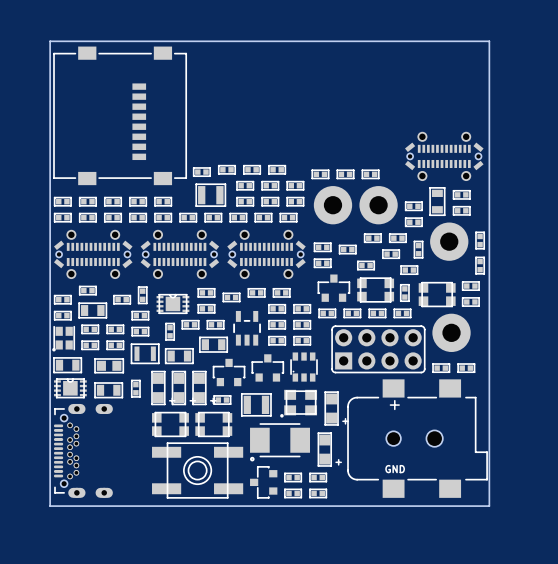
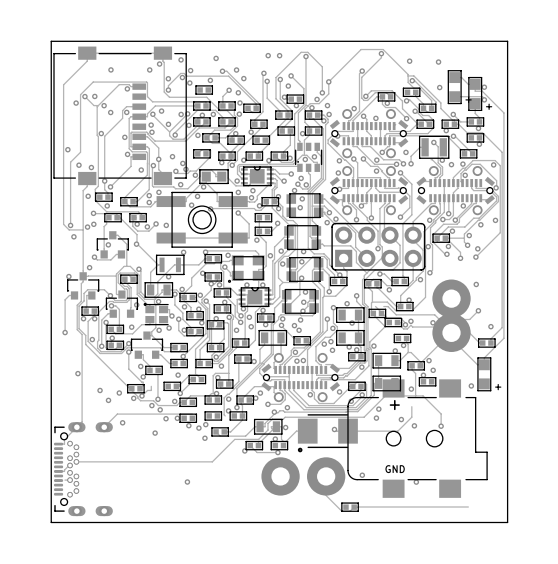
board edge: (51, 41) (50, 506) (489, 506) (489, 41) -> (51, 41) (51, 522) (507, 522) (507, 41) (489, 41)
track: none -> (381, 53) (381, 57) (361, 77) (361, 98) (367, 100) (375, 92) (386, 92) (390, 96)
via: none -> (381, 53)
via: none -> (268, 55)
via: none -> (279, 55)
track: none -> (306, 56) (306, 105) (298, 112) (299, 146)
via: none -> (306, 56)
via: none -> (216, 58)
via: none -> (181, 59)
via: none -> (409, 61)
via: none -> (438, 62)
via: none -> (159, 64)
via: none -> (110, 69)
via: none -> (149, 69)
via: none -> (190, 70)
via: none -> (236, 70)
track: none -> (222, 71) (226, 71) (260, 104) (259, 112) (252, 112) (247, 108)
via: none -> (222, 71)
track: none -> (362, 71) (359, 73) (359, 111) (348, 120) (348, 126)
via: none -> (362, 71)
track: none -> (263, 73) (263, 111) (254, 120) (254, 124)
via: none -> (263, 73)
track: none -> (291, 75) (303, 88) (303, 104) (294, 114) (294, 160) (292, 162) (281, 162) (275, 156)
via: none -> (291, 75)
track: none -> (408, 75) (413, 75) (440, 102) (440, 108) (454, 120) (454, 124) (458, 124) (466, 132) (482, 132) (502, 152) (502, 327) (490, 338) (490, 343)
via: none -> (182, 77)
track: none -> (454, 77) (461, 77) (468, 84) (475, 84) (475, 91) (482, 91) (503, 112) (503, 338) (484, 357) (484, 364) (477, 364) (456, 344) (439, 344) (420, 363)
via: none -> (168, 78)
via: none -> (243, 78)
track: none -> (280, 79) (280, 99) (292, 110) (292, 118) (282, 126) (282, 131)
via: none -> (280, 79)
via: none -> (210, 80)
track: none -> (412, 80) (414, 80) (436, 102) (436, 111) (427, 112) (423, 108) (423, 104) (415, 96) (415, 92)
via: none -> (412, 80)
track: none -> (267, 81) (267, 98) (279, 110) (279, 115)
via: none -> (267, 81)
via: none -> (328, 81)
via: none -> (189, 83)
track: none -> (139, 86) (119, 84) (97, 106) (98, 186) (95, 189) (95, 200) (106, 211) (138, 211) (144, 217)
via: none -> (288, 86)
via: none -> (439, 87)
part: none -> (454, 87)
via: none -> (484, 87)
via: none -> (127, 88)
track: none -> (168, 90) (168, 85) (180, 73) (186, 76) (228, 76) (256, 103) (256, 108)
via: none -> (168, 90)
part: none -> (204, 90)
track: none -> (229, 90) (222, 96) (222, 105)
via: none -> (229, 90)
via: none -> (238, 92)
track: none -> (322, 92) (322, 66) (307, 52) (301, 52) (276, 77) (276, 98) (288, 110) (288, 119) (269, 135) (269, 143) (261, 152) (258, 152) (258, 156)
via: none -> (322, 92)
part: none -> (411, 92)
part: none -> (475, 93)
track: none -> (84, 96) (93, 105) (98, 105)
via: none -> (84, 96)
via: none -> (94, 96)
track: none -> (365, 96) (371, 90) (392, 90) (402, 101) (402, 108) (417, 124)
via: none -> (365, 96)
part: none -> (386, 96)
via: none -> (284, 97)
part: none -> (295, 99)
via: none -> (317, 99)
via: none -> (484, 99)
track: none -> (406, 100) (409, 99) (422, 115) (428, 115) (434, 120) (434, 127) (427, 133) (387, 133) (385, 141)
via: none -> (406, 100)
via: none -> (239, 102)
via: none -> (76, 103)
via: none -> (387, 103)
track: none -> (475, 103) (475, 113) (479, 117) (479, 121)
via: none -> (104, 105)
track: none -> (197, 105) (155, 105) (147, 113) (147, 116) (131, 116) (129, 118) (129, 148) (132, 151) (147, 152) (147, 175) (124, 197) (124, 201) (129, 206) (150, 206) (155, 201) (186, 201) (186, 198) (201, 182) (206, 183)
part: none -> (201, 105)
track: none -> (206, 105) (206, 101) (152, 101) (147, 96) (146, 82) (93, 82) (80, 94) (80, 152) (70, 162) (70, 225)
part: none -> (226, 105)
via: none -> (296, 105)
via: none -> (327, 105)
track: none -> (139, 106) (126, 106) (122, 110) (122, 118) (104, 136) (104, 189) (108, 193) (108, 197)
via: none -> (311, 107)
part: none -> (252, 108)
via: none -> (354, 108)
part: none -> (427, 108)
track: none -> (431, 108) (431, 100) (419, 88) (413, 88) (408, 82) (408, 74) (383, 49) (361, 49) (328, 81) (328, 93) (319, 103) (310, 103) (304, 109) (304, 122) (309, 126) (309, 135) (304, 140) (304, 155)
via: none -> (161, 111)
track: none -> (234, 111) (234, 115) (237, 118) (237, 125) (225, 137) (215, 137)
track: none -> (415, 111) (429, 124)
via: none -> (415, 111)
via: none -> (110, 112)
via: none -> (126, 112)
track: none -> (187, 113) (169, 131)
via: none -> (187, 113)
track: none -> (152, 114) (169, 131)
via: none -> (152, 114)
via: none -> (181, 114)
via: none -> (213, 114)
via: none -> (239, 114)
via: none -> (329, 114)
track: none -> (453, 114) (460, 121) (471, 121)
via: none -> (453, 114)
via: none -> (202, 115)
part: none -> (283, 115)
track: none -> (309, 115) (309, 119) (313, 119) (323, 128) (323, 178) (310, 192) (310, 236) (316, 238) (316, 244) (350, 245) (356, 251) (356, 262) (366, 273)
part: none -> (313, 115)
track: none -> (317, 115) (323, 115) (328, 119) (328, 122) (325, 125) (325, 179) (312, 192) (312, 220) (316, 224) (316, 230)
track: none -> (363, 116) (366, 119) (366, 131) (371, 135) (371, 141)
via: none -> (363, 116)
via: none -> (375, 118)
track: none -> (406, 118) (395, 107) (385, 107) (382, 104) (382, 96) (376, 96) (353, 120) (353, 131) (336, 131) (328, 139) (328, 143) (353, 168) (353, 183)
via: none -> (406, 118)
via: none -> (323, 120)
part: none -> (201, 121)
track: none -> (206, 121) (201, 126) (197, 126) (183, 139) (173, 139) (169, 135) (169, 131)
track: none -> (222, 121) (222, 117) (215, 110) (197, 110) (175, 132) (175, 135)
part: none -> (226, 121)
track: none -> (231, 121) (225, 127) (199, 127) (185, 141) (154, 141) (146, 132) (131, 132) (131, 146) (147, 146) (149, 148) (149, 189) (137, 201) (133, 201)
part: none -> (475, 121)
via: none -> (168, 124)
part: none -> (258, 124)
track: none -> (417, 124) (409, 131) (389, 131) (389, 126)
part: none -> (425, 124)
part: none -> (450, 124)
via: none -> (151, 125)
via: none -> (188, 125)
track: none -> (263, 126) (237, 151) (237, 160) (232, 165)
track: none -> (357, 126) (357, 141)
track: none -> (380, 126) (380, 141)
via: none -> (478, 128)
via: none -> (446, 130)
part: none -> (286, 131)
track: none -> (290, 131) (290, 145) (283, 152) (283, 156) (290, 158)
part: none -> (313, 131)
via: none -> (151, 132)
via: none -> (251, 132)
via: none -> (101, 133)
via: none -> (235, 133)
via: none -> (302, 133)
part: none -> (369, 133)
via: none -> (175, 135)
via: none -> (197, 135)
track: none -> (139, 136) (147, 136) (158, 148) (158, 169) (162, 173) (162, 178)
track: none -> (337, 136) (348, 135) (348, 141)
via: none -> (337, 136)
track: none -> (453, 136) (472, 153)
via: none -> (453, 136)
via: none -> (124, 137)
part: none -> (211, 137)
part: none -> (475, 137)
part: none -> (236, 140)
track: none -> (240, 140) (240, 144) (231, 152) (231, 160) (228, 163) (228, 178) (235, 185) (250, 184) (250, 175) (242, 174) (239, 171) (240, 166) (299, 167)
part: none -> (261, 140)
track: none -> (353, 141) (353, 146) (356, 146) (374, 164) (396, 164)
track: none -> (362, 141) (362, 146) (370, 146) (383, 159) (399, 159) (403, 163)
track: none -> (394, 142) (403, 142)
track: none -> (433, 142) (438, 146) (438, 162) (442, 167) (439, 183)
via: none -> (433, 142)
via: none -> (479, 144)
track: none -> (317, 146) (317, 152) (321, 156) (321, 178) (308, 191) (308, 248) (314, 253) (324, 253) (329, 259) (329, 264) (342, 277) (342, 281)
track: none -> (425, 147) (420, 147) (411, 156) (411, 163)
part: none -> (434, 147)
via: none -> (67, 149)
track: none -> (382, 152) (389, 146) (389, 135) (446, 135) (460, 149) (464, 149) (464, 153)
via: none -> (382, 152)
via: none -> (405, 152)
track: none -> (197, 153) (201, 149) (210, 150) (210, 156) (196, 171) (190, 171) (187, 173) (178, 173) (175, 171)
part: none -> (201, 153)
part: none -> (468, 153)
via: none -> (127, 154)
track: none -> (231, 154) (220, 143) (212, 143) (206, 137) (214, 130) (230, 130) (235, 125) (235, 118) (227, 110) (220, 110) (206, 97) (169, 97) (164, 92) (162, 53) (87, 53) (87, 61) (63, 84) (63, 224) (69, 229) (83, 229)
track: none -> (139, 156) (131, 156) (131, 166) (110, 186)
via: none -> (172, 156)
part: none -> (254, 156)
part: none -> (279, 156)
via: none -> (314, 156)
part: (444, 156) -> none
via: none -> (290, 158)
track: none -> (363, 158) (370, 166) (377, 166) (389, 177) (389, 183)
via: none -> (363, 158)
via: none -> (158, 159)
via: none -> (305, 159)
track: none -> (353, 159) (357, 162) (357, 198)
via: none -> (353, 159)
track: none -> (431, 159) (440, 168) (440, 173) (435, 177) (435, 183)
via: none -> (243, 160)
via: none -> (268, 160)
via: none -> (339, 160)
via: none -> (376, 160)
via: none -> (442, 160)
via: none -> (221, 162)
via: none -> (182, 163)
track: none -> (268, 163) (293, 164) (302, 155) (306, 155) (313, 162) (317, 162) (317, 167)
track: none -> (268, 163) (239, 164) (237, 174) (244, 178)
via: none -> (403, 163)
via: none -> (411, 163)
via: none -> (396, 164)
via: none -> (451, 164)
via: none -> (462, 164)
via: none -> (493, 164)
via: none -> (78, 165)
track: none -> (153, 165) (153, 186) (187, 188) (200, 176) (201, 170) (211, 170) (215, 176) (221, 176)
via: none -> (153, 165)
via: none -> (232, 165)
via: none -> (91, 167)
track: none -> (308, 167) (310, 186) (307, 189) (302, 189) (297, 184)
via: none -> (185, 169)
part position: (226, 169) -> (226, 156)
part: (252, 169) -> none
track: none -> (270, 169) (275, 169) (279, 174) (291, 174)
part: (277, 169) -> none
via: none -> (141, 170)
via: none -> (175, 171)
via: none -> (376, 171)
part: (201, 172) -> none
track: none -> (400, 172) (411, 184) (411, 214) (402, 223) (404, 281)
via: none -> (400, 172)
via: none -> (338, 173)
track: none -> (270, 174) (275, 174) (284, 181)
via: none -> (291, 174)
part: (320, 174) -> none
part: (345, 174) -> none
part: (370, 174) -> none
via: none -> (195, 175)
via: none -> (465, 175)
part: none -> (257, 176)
track: none -> (357, 177) (380, 177) (380, 183)
track: none -> (87, 178) (87, 186) (83, 190) (83, 281) (81, 283) (81, 301) (77, 305) (77, 329) (82, 334) (82, 422) (64, 439) (64, 444) (58, 444)
track: none -> (270, 178) (276, 180) (274, 198) (282, 206) (282, 215) (287, 220) (293, 220) (297, 224) (297, 268) (291, 269) (291, 276)
via: none -> (301, 178)
via: none -> (104, 181)
via: none -> (237, 181)
via: none -> (284, 181)
track: none -> (421, 181) (429, 181)
track: none -> (206, 183) (217, 193) (217, 201) (249, 202) (254, 202) (257, 196) (270, 183) (275, 183) (272, 189) (272, 208) (288, 224) (295, 225) (295, 249) (278, 262) (278, 277) (282, 282)
track: none -> (348, 183) (348, 188) (339, 189)
track: none -> (371, 183) (371, 188) (366, 192) (366, 203) (361, 205)
track: none -> (375, 183) (375, 188) (379, 192) (400, 192)
track: none -> (385, 183) (385, 188) (401, 188) (409, 196) (409, 207) (400, 217)
track: none -> (444, 183) (444, 212) (430, 227) (432, 270) (429, 272)
track: none -> (453, 183) (453, 177) (473, 160) (495, 160) (500, 165) (500, 232) (475, 257)
track: none -> (457, 183) (457, 188) (453, 192) (453, 215) (449, 219) (442, 219)
track: none -> (462, 183) (461, 173) (471, 164) (480, 164) (496, 180) (496, 187)
track: none -> (471, 183) (473, 190) (490, 190) (496, 197) (496, 200) (479, 218) (473, 218) (464, 227) (448, 227) (437, 238) (437, 242) (450, 242) (460, 252) (460, 258)
track: none -> (476, 183) (476, 188) (490, 188) (498, 196) (498, 201) (464, 234) (464, 242) (467, 245)
via: none -> (180, 184)
via: none -> (297, 184)
via: none -> (306, 184)
part: (245, 185) -> none
part: (270, 185) -> none
part: (295, 185) -> none
via: none -> (110, 186)
via: none -> (203, 186)
via: none -> (496, 187)
via: none -> (339, 189)
via: none -> (252, 190)
via: none -> (294, 190)
part: none -> (369, 190)
part footprint: [452, 190, 471, 200] -> [416, 165, 495, 216]
via: none -> (158, 192)
via: none -> (238, 192)
via: none -> (149, 195)
part: (210, 195) -> none
via: none -> (88, 196)
via: none -> (197, 196)
via: none -> (278, 196)
part: none -> (103, 197)
via: none -> (251, 197)
via: none -> (302, 198)
track: none -> (348, 198) (348, 203) (356, 209) (356, 219)
track: none -> (353, 198) (353, 203) (378, 231) (378, 248)
track: none -> (385, 198) (385, 203) (379, 208) (379, 244) (382, 247) (382, 258)
track: none -> (389, 198) (389, 203) (384, 207) (384, 229) (400, 245) (400, 262) (393, 269) (375, 269) (364, 280) (364, 303) (367, 306) (368, 365) (355, 379) (321, 379) (321, 385)
track: none -> (435, 198) (435, 203) (431, 203) (413, 221) (413, 240) (423, 250) (423, 271) (400, 295) (400, 306) (396, 306) (376, 287) (376, 283)
track: none -> (439, 198) (440, 213) (424, 231) (425, 297) (412, 310) (395, 310) (387, 302) (372, 302)
track: none -> (448, 198) (448, 213)
track: none -> (471, 198) (471, 203) (455, 220)
track: none -> (476, 198) (476, 203) (459, 218) (457, 224) (443, 224) (432, 235) (432, 241) (446, 254)
track: none -> (267, 199) (267, 203) (260, 210) (254, 208) (210, 208)
track: none -> (318, 199) (324, 199) (360, 235) (366, 235)
track: none -> (334, 199) (342, 199)
track: none -> (342, 199) (342, 205) (347, 210)
track: none -> (481, 199) (489, 199)
part: (62, 201) -> none
part: (87, 201) -> none
part: (113, 201) -> none
part: none -> (128, 201)
part: (138, 201) -> none
part: (163, 201) -> none
part: (245, 201) -> none
part: (295, 201) -> none
part: (437, 201) -> none
via: none -> (149, 202)
via: none -> (107, 205)
via: none -> (191, 205)
via: none -> (259, 205)
part: none -> (304, 205)
part: (332, 205) -> none
via: none -> (361, 205)
part: (378, 205) -> none
via: none -> (463, 205)
track: none -> (312, 206) (324, 206) (329, 212)
part: (413, 206) -> none
via: none -> (300, 207)
via: none -> (210, 208)
via: none -> (278, 208)
part: (461, 210) -> none
track: none -> (318, 212) (324, 212) (334, 223) (345, 223) (355, 232) (355, 247) (366, 258)
via: none -> (329, 212)
track: none -> (93, 213) (115, 213) (136, 234) (136, 243)
via: none -> (93, 213)
track: none -> (238, 213) (249, 223) (249, 238) (171, 238)
via: none -> (238, 213)
via: none -> (448, 213)
track: none -> (259, 215) (259, 235) (266, 242) (266, 265) (262, 269) (258, 269) (258, 290) (253, 294)
part: (62, 217) -> none
part: (87, 217) -> none
track: none -> (136, 217) (132, 221) (132, 226) (137, 231) (149, 231) (156, 224)
part: (163, 217) -> none
part: (188, 217) -> none
part: (213, 217) -> none
part: (238, 217) -> none
part: (288, 217) -> none
via: none -> (400, 217)
via: none -> (371, 218)
track: none -> (106, 219) (104, 226) (104, 254)
part: none -> (202, 219)
via: none -> (335, 219)
via: none -> (356, 219)
via: none -> (442, 219)
via: none -> (429, 220)
via: none -> (455, 220)
via: none -> (495, 220)
via: none -> (327, 222)
part: (413, 222) -> none
part footprint: [430, 222, 469, 261] -> [432, 233, 451, 243]
via: none -> (156, 223)
track: none -> (277, 223) (271, 231) (267, 231)
via: none -> (277, 223)
via: none -> (93, 224)
via: none -> (137, 224)
via: none -> (480, 224)
via: none -> (70, 225)
via: none -> (166, 225)
via: none -> (147, 226)
via: none -> (87, 227)
track: none -> (289, 230) (289, 237) (284, 237) (274, 247) (272, 294) (267, 294)
part: none -> (263, 231)
via: none -> (452, 231)
track: none -> (112, 235) (117, 235) (126, 244) (126, 266)
via: none -> (469, 235)
via: none -> (73, 236)
part: none -> (302, 237)
part: (372, 238) -> none
part: (397, 238) -> none
track: none -> (445, 238) (464, 238)
via: none -> (256, 240)
part: (480, 240) -> none
track: none -> (136, 243) (158, 264)
via: none -> (108, 244)
part: none -> (112, 244)
via: none -> (136, 244)
track: none -> (289, 244) (289, 250) (274, 263) (274, 297) (267, 299)
via: none -> (467, 245)
via: none -> (428, 246)
via: none -> (448, 246)
part: (322, 247) -> none
via: none -> (378, 248)
via: none -> (477, 248)
part: (347, 249) -> none
part: (418, 249) -> none
via: none -> (281, 251)
via: none -> (303, 251)
via: none -> (183, 252)
track: none -> (205, 252) (255, 250) (258, 253) (258, 260)
via: none -> (205, 252)
part: (93, 254) -> none
track: none -> (121, 254) (116, 254) (110, 259) (97, 259) (94, 257)
part: (179, 254) -> none
part: (266, 254) -> none
part: (391, 254) -> none
via: none -> (446, 254)
via: none -> (228, 255)
via: none -> (270, 255)
via: none -> (94, 257)
via: none -> (475, 257)
track: none -> (209, 258) (205, 258) (198, 264) (174, 264) (157, 281) (157, 293) (154, 297) (145, 297) (140, 292) (140, 271) (138, 269)
part: none -> (213, 258)
track: none -> (343, 258) (343, 268) (347, 271) (347, 284) (335, 296) (324, 296)
track: none -> (389, 258) (381, 258) (362, 279) (362, 303) (366, 307) (367, 360) (360, 363) (343, 377) (318, 377) (316, 385)
track: none -> (413, 258) (413, 280) (407, 285) (386, 285) (380, 279) (373, 279) (368, 283) (368, 287) (372, 291) (372, 302)
via: none -> (460, 258)
track: none -> (217, 260) (214, 263) (206, 263) (191, 278) (191, 285) (184, 293) (184, 301) (190, 307) (190, 315)
track: none -> (237, 260) (217, 260)
track: none -> (220, 261) (220, 268) (223, 271) (223, 287) (229, 287) (237, 294) (253, 294)
via: none -> (301, 261)
part: (322, 263) -> none
track: none -> (158, 264) (150, 272) (150, 289)
via: none -> (282, 264)
part: (366, 265) -> none
part: (480, 265) -> none
via: none -> (89, 267)
track: none -> (224, 267) (230, 272) (230, 275) (237, 275)
via: none -> (224, 267)
via: none -> (138, 269)
part: none -> (304, 269)
part: (409, 270) -> none
via: none -> (429, 272)
via: none -> (202, 273)
part footprint: [317, 274, 350, 302] -> [329, 276, 348, 287]
track: none -> (379, 274) (384, 274) (391, 281) (396, 281)
via: none -> (379, 274)
via: none -> (339, 275)
via: none -> (68, 276)
track: none -> (116, 276) (83, 276)
via: none -> (168, 276)
part: none -> (213, 276)
track: none -> (217, 276) (217, 281) (211, 283) (211, 290) (201, 299) (201, 302) (207, 308) (207, 337) (195, 349) (195, 375)
track: none -> (318, 276) (318, 282) (324, 287) (324, 296)
part footprint: [357, 277, 395, 303] -> [364, 279, 382, 289]
track: none -> (301, 278) (299, 279) (299, 294) (286, 308)
via: none -> (301, 278)
track: none -> (124, 279) (124, 283) (131, 287) (130, 313)
part: none -> (128, 279)
track: none -> (133, 279) (128, 275) (120, 275) (120, 282) (129, 288) (129, 299) (126, 302) (109, 301) (98, 312) (97, 348) (101, 351) (120, 351) (128, 343)
via: none -> (420, 279)
track: none -> (334, 281) (334, 274) (327, 267) (327, 259) (324, 256) (312, 256) (297, 271) (296, 282) (282, 282)
part: none -> (400, 281)
track: none -> (282, 282) (279, 285) (279, 296) (272, 303) (261, 306) (255, 312) (255, 340) (248, 347) (236, 347)
via: none -> (211, 283)
via: none -> (219, 284)
via: none -> (476, 284)
part footprint: [79, 285, 97, 296] -> [67, 272, 100, 300]
via: none -> (246, 285)
via: none -> (262, 285)
part: (470, 286) -> none
part footprint: [247, 288, 266, 298] -> [238, 287, 272, 308]
part: none -> (158, 289)
via: none -> (182, 289)
via: none -> (389, 289)
track: none -> (329, 291) (329, 275) (323, 269) (314, 269) (312, 281) (320, 289) (320, 331) (304, 347) (293, 347) (291, 350) (291, 355) (280, 364) (280, 369)
via: none -> (329, 291)
part: (206, 292) -> none
part: none -> (222, 292)
track: none -> (226, 292) (226, 297) (235, 305) (235, 316) (240, 322)
part: (281, 292) -> none
via: none -> (305, 292)
part: (404, 292) -> none
track: none -> (121, 294) (116, 294) (116, 274) (124, 266) (130, 266) (139, 275) (139, 293) (145, 299) (154, 299) (162, 289) (176, 289) (180, 293) (180, 297) (184, 297)
track: none -> (174, 294) (174, 305) (182, 313) (182, 319) (190, 327) (190, 331)
via: none -> (174, 294)
track: none -> (247, 294) (244, 343)
track: none -> (286, 294) (286, 300) (281, 300) (274, 308) (274, 320) (271, 324) (271, 353) (236, 388) (236, 407)
track: none -> (314, 294) (314, 300) (309, 300) (307, 306) (302, 311)
part: (437, 294) -> none
track: none -> (74, 295) (69, 295) (65, 299) (65, 332)
track: none -> (91, 295) (86, 295) (86, 311)
via: none -> (110, 295)
part footprint: [113, 295, 131, 305] -> [105, 290, 139, 318]
part: (142, 295) -> none
via: none -> (200, 295)
track: none -> (356, 295) (356, 301) (364, 309) (365, 360) (359, 361) (342, 375) (316, 375) (316, 369)
via: none -> (356, 295)
track: none -> (324, 296) (322, 331) (298, 356) (292, 356) (284, 364) (284, 369)
part: none -> (188, 297)
track: none -> (192, 297) (196, 297) (205, 309) (205, 333) (183, 356) (183, 363)
part: (231, 297) -> none
part: none -> (451, 298)
part: (62, 299) -> none
track: none -> (154, 299) (155, 327) (151, 331) (151, 335)
track: none -> (242, 299) (237, 299) (237, 312) (241, 315)
via: none -> (409, 300)
via: none -> (158, 301)
track: none -> (206, 301) (209, 304) (209, 340) (200, 349) (200, 363)
via: none -> (206, 301)
part footprint: [78, 302, 108, 319] -> [81, 306, 100, 316]
track: none -> (224, 302) (226, 312) (230, 312) (233, 315) (232, 349) (218, 363) (208, 363)
via: none -> (224, 302)
via: none -> (303, 302)
track: none -> (372, 302) (371, 312) (385, 326) (369, 342) (371, 395) (357, 409) (303, 409) (284, 390) (284, 379) (267, 380) (259, 373) (259, 368) (273, 354) (273, 324) (278, 317) (281, 314) (312, 315) (314, 308)
part: (470, 302) -> none
part: (172, 303) -> none
via: none -> (347, 303)
via: none -> (136, 304)
part footprint: [293, 304, 311, 314] -> [281, 288, 319, 314]
track: none -> (111, 305) (115, 305) (119, 309) (119, 329)
via: none -> (111, 305)
via: none -> (184, 306)
track: none -> (375, 306) (386, 317) (400, 317) (405, 324)
track: none -> (383, 306) (387, 306) (396, 314) (434, 314) (439, 319) (469, 319) (478, 310)
part: none -> (404, 306)
track: none -> (333, 307) (333, 323) (337, 330) (330, 337) (325, 337) (315, 346) (315, 360) (321, 364) (321, 369)
via: none -> (333, 307)
part: (206, 308) -> none
part: none -> (222, 308)
via: none -> (243, 308)
part: (277, 308) -> none
part footprint: [343, 308, 362, 319] -> [336, 307, 365, 323]
track: none -> (149, 309) (149, 304) (147, 304) (137, 294) (137, 275) (134, 273) (120, 273) (118, 282) (127, 289) (127, 299) (115, 300) (104, 289) (87, 289) (84, 293) (84, 301) (79, 306) (79, 328) (85, 335) (85, 344) (140, 400) (153, 400) (158, 405) (176, 405) (180, 402) (184, 402) (190, 395) (209, 395)
track: none -> (163, 309) (169, 309) (171, 316)
via: none -> (198, 309)
via: none -> (263, 310)
via: none -> (478, 310)
track: none -> (94, 311) (94, 315) (88, 321) (88, 341) (100, 353) (121, 353) (127, 347) (160, 347) (164, 351) (179, 351) (183, 347)
via: none -> (302, 311)
track: none -> (113, 313) (108, 313) (101, 320) (101, 346)
part: (327, 313) -> none
part: (402, 313) -> none
part: (62, 315) -> none
part: (140, 315) -> none
part: none -> (195, 315)
via: none -> (241, 315)
track: none -> (358, 315) (358, 344) (361, 347) (361, 356) (349, 368) (334, 368) (331, 364) (325, 364)
via: none -> (171, 316)
track: none -> (229, 317) (230, 348) (217, 361) (214, 361) (211, 355) (215, 351) (219, 351) (219, 343) (224, 338) (224, 327)
via: none -> (229, 317)
via: none -> (249, 317)
part: none -> (265, 317)
via: none -> (83, 318)
via: none -> (94, 318)
track: none -> (216, 318) (211, 323) (211, 347)
via: none -> (216, 318)
via: none -> (282, 318)
track: none -> (149, 319) (149, 324) (141, 324) (132, 333) (115, 333) (111, 329)
track: none -> (178, 319) (178, 330) (184, 335) (194, 335) (199, 331)
via: none -> (178, 319)
track: none -> (327, 319) (327, 330) (307, 349) (307, 369)
via: none -> (327, 319)
via: none -> (300, 320)
via: none -> (410, 321)
track: none -> (106, 322) (106, 347) (115, 349) (119, 345)
via: none -> (106, 322)
via: none -> (201, 322)
via: none -> (240, 322)
part: none -> (393, 322)
track: none -> (397, 322) (401, 322) (401, 326) (403, 328) (407, 328) (410, 325) (412, 327) (435, 327) (438, 323) (460, 323) (478, 343) (482, 343)
via: none -> (432, 322)
via: none -> (352, 323)
part: (190, 324) -> none
via: none -> (265, 324)
part: (277, 324) -> none
part: (302, 324) -> none
via: none -> (405, 324)
track: none -> (281, 325) (293, 338) (298, 338)
via: none -> (281, 325)
via: none -> (294, 325)
via: none -> (251, 326)
via: none -> (490, 326)
via: none -> (131, 327)
track: none -> (216, 327) (220, 322) (228, 323) (228, 346) (216, 357)
via: none -> (169, 328)
part: (247, 328) -> none
via: none -> (332, 328)
part: (90, 329) -> none
via: none -> (159, 330)
via: none -> (184, 330)
via: none -> (236, 330)
via: none -> (299, 330)
part: (140, 331) -> none
part: (170, 331) -> none
part: none -> (195, 331)
via: none -> (65, 332)
track: none -> (146, 335) (152, 335) (164, 347) (175, 347)
part footprint: [199, 336, 228, 353] -> [206, 342, 225, 353]
part footprint: [268, 336, 286, 346] -> [258, 329, 288, 346]
track: none -> (264, 337) (264, 344) (259, 349) (259, 363) (224, 397) (225, 415)
track: none -> (281, 337) (281, 355) (274, 362) (275, 369)
part: none -> (350, 337)
part rotation: 0° (63, 338) -> 90° clockwise (156, 314)
part position: (63, 338) -> (156, 314)
via: none -> (112, 338)
part: none -> (402, 338)
track: none -> (406, 338) (408, 352)
via: none -> (92, 339)
via: none -> (330, 341)
via: none -> (128, 343)
track: none -> (236, 343) (236, 347) (228, 355) (228, 384)
part: none -> (240, 343)
part: none -> (486, 343)
via: none -> (324, 344)
part: (90, 345) -> none
part: none -> (146, 345)
via: none -> (403, 345)
via: none -> (101, 346)
via: none -> (373, 346)
part: none -> (179, 347)
via: none -> (349, 347)
via: none -> (356, 349)
part position: (378, 349) -> (378, 246)
via: none -> (332, 350)
via: none -> (395, 350)
track: none -> (128, 352) (128, 369) (143, 382) (143, 386)
via: none -> (128, 352)
via: none -> (295, 352)
track: none -> (408, 352) (400, 360) (394, 360)
track: none -> (408, 352) (411, 352) (420, 361) (420, 365)
part position: (145, 353) -> (170, 264)
track: none -> (138, 354) (143, 354) (143, 359) (149, 366) (149, 370)
track: none -> (155, 354) (160, 354) (169, 363) (175, 363)
part: (179, 356) -> none
via: none -> (183, 356)
part: none -> (356, 356)
via: none -> (216, 357)
track: none -> (238, 358) (238, 381) (232, 388) (220, 388) (220, 384)
part: none -> (242, 358)
via: none -> (303, 360)
track: none -> (378, 360) (378, 383) (374, 383) (374, 395) (357, 411) (280, 410) (275, 413)
part: none -> (386, 360)
via: none -> (429, 360)
via: none -> (254, 361)
via: none -> (296, 361)
part: none -> (179, 363)
part: none -> (204, 363)
part: (67, 365) -> none
part position: (109, 365) -> (214, 176)
track: none -> (412, 365) (412, 369) (415, 373) (415, 395)
part: none -> (416, 365)
via: none -> (140, 366)
via: none -> (221, 366)
part: (267, 367) -> none
part position: (304, 367) -> (308, 157)
via: none -> (361, 367)
part: (441, 368) -> none
part: (466, 368) -> none
track: none -> (289, 369) (289, 390) (306, 407) (356, 407) (366, 397) (366, 384) (364, 382) (356, 382) (352, 386) (348, 386) (333, 403) (319, 403) (314, 398) (314, 392) (312, 390) (312, 369)
part: none -> (154, 370)
via: none -> (433, 370)
part footprint: [171, 371, 186, 406] -> [163, 381, 182, 392]
part footprint: [192, 371, 207, 406] -> [188, 374, 207, 385]
part: (229, 372) -> none
via: none -> (77, 373)
track: none -> (228, 373) (215, 373) (213, 375) (213, 393)
track: none -> (158, 374) (157, 399)
part: none -> (484, 374)
via: none -> (178, 375)
via: none -> (423, 375)
via: none -> (143, 376)
track: none -> (269, 376) (289, 376)
via: none -> (217, 377)
part: none -> (300, 377)
track: none -> (193, 379) (189, 379) (189, 384) (180, 393)
track: none -> (201, 379) (197, 375) (189, 375) (179, 386) (176, 386)
part: none -> (427, 381)
part: none -> (386, 383)
part: none -> (224, 384)
track: none -> (280, 385) (280, 390) (285, 394) (285, 399) (280, 404) (267, 404)
track: none -> (293, 385) (293, 390) (308, 405) (353, 405) (362, 394)
via: none -> (471, 385)
track: none -> (151, 386) (151, 390) (147, 390) (141, 396)
track: none -> (274, 386) (254, 386) (241, 400) (242, 420) (230, 431) (224, 431)
track: none -> (274, 386) (274, 392) (278, 397)
part: none -> (356, 386)
part: (70, 388) -> none
part rotation: 0° (135, 388) -> 90° clockwise (135, 388)
part: (158, 388) -> none
via: none -> (411, 389)
via: none -> (100, 390)
part: (108, 390) -> none
track: none -> (360, 390) (351, 401)
via: none -> (339, 391)
via: none -> (119, 393)
via: none -> (180, 393)
track: none -> (216, 393) (211, 393) (209, 395)
via: none -> (216, 393)
via: none -> (260, 393)
via: none -> (310, 394)
via: none -> (362, 394)
via: none -> (141, 396)
via: none -> (133, 398)
via: none -> (255, 398)
via: none -> (157, 399)
via: none -> (228, 399)
via: none -> (108, 400)
part: none -> (213, 400)
part: (222, 400) -> none
part: none -> (245, 400)
via: none -> (174, 401)
via: none -> (351, 401)
part: none -> (188, 402)
part position: (298, 403) -> (246, 269)
part: (256, 404) -> none
via: none -> (267, 404)
via: none -> (151, 405)
track: none -> (411, 406) (411, 417) (397, 431) (336, 431) (334, 429)
via: none -> (236, 407)
via: none -> (287, 407)
part: (331, 408) -> none
via: none -> (160, 409)
via: none -> (378, 409)
via: none -> (228, 410)
via: none -> (274, 412)
track: none -> (275, 413) (265, 423) (265, 426) (255, 426) (245, 436) (220, 436) (216, 431)
track: none -> (192, 414) (117, 414) (104, 427)
part: none -> (213, 415)
part: none -> (238, 415)
via: none -> (166, 418)
via: none -> (177, 418)
part: none -> (188, 418)
via: none -> (376, 418)
via: none -> (401, 419)
via: none -> (122, 422)
part footprint: [249, 423, 311, 462] -> [270, 440, 289, 451]
part: (170, 424) -> none
via: none -> (205, 424)
part: (213, 424) -> none
via: none -> (188, 425)
via: none -> (414, 425)
part: none -> (268, 426)
track: none -> (441, 426) (441, 413) (423, 395) (385, 395) (364, 417) (285, 417) (283, 419) (272, 419) (268, 423) (268, 430) (258, 439) (234, 439) (212, 461) (76, 461)
via: none -> (441, 426)
via: none -> (285, 427)
via: none -> (198, 428)
via: none -> (334, 429)
part: none -> (220, 431)
track: none -> (307, 431) (296, 431) (286, 441) (283, 441) (281, 439) (281, 426) (271, 426) (272, 430) (261, 441) (258, 441) (258, 445)
via: none -> (155, 433)
part: none -> (327, 433)
via: none -> (204, 438)
via: none -> (275, 439)
track: none -> (250, 445) (257, 452) (277, 452)
part: none -> (254, 445)
part: (324, 449) -> none
part position: (83, 450) -> (83, 469)
via: none -> (244, 450)
via: none -> (277, 452)
track: none -> (70, 465) (64, 471) (58, 471)
part: (197, 470) -> none
part footprint: [309, 472, 327, 483] -> [307, 457, 346, 496]
via: none -> (362, 475)
part: none -> (280, 476)
track: none -> (326, 476) (326, 495) (341, 511) (350, 511) (354, 507) (358, 506) (468, 506)
part: (293, 477) -> none
track: none -> (64, 480) (70, 480)
via: none -> (187, 482)
part: (263, 482) -> none
via: none -> (416, 482)
part: (293, 493) -> none
part: (318, 493) -> none
part: none -> (350, 507)

